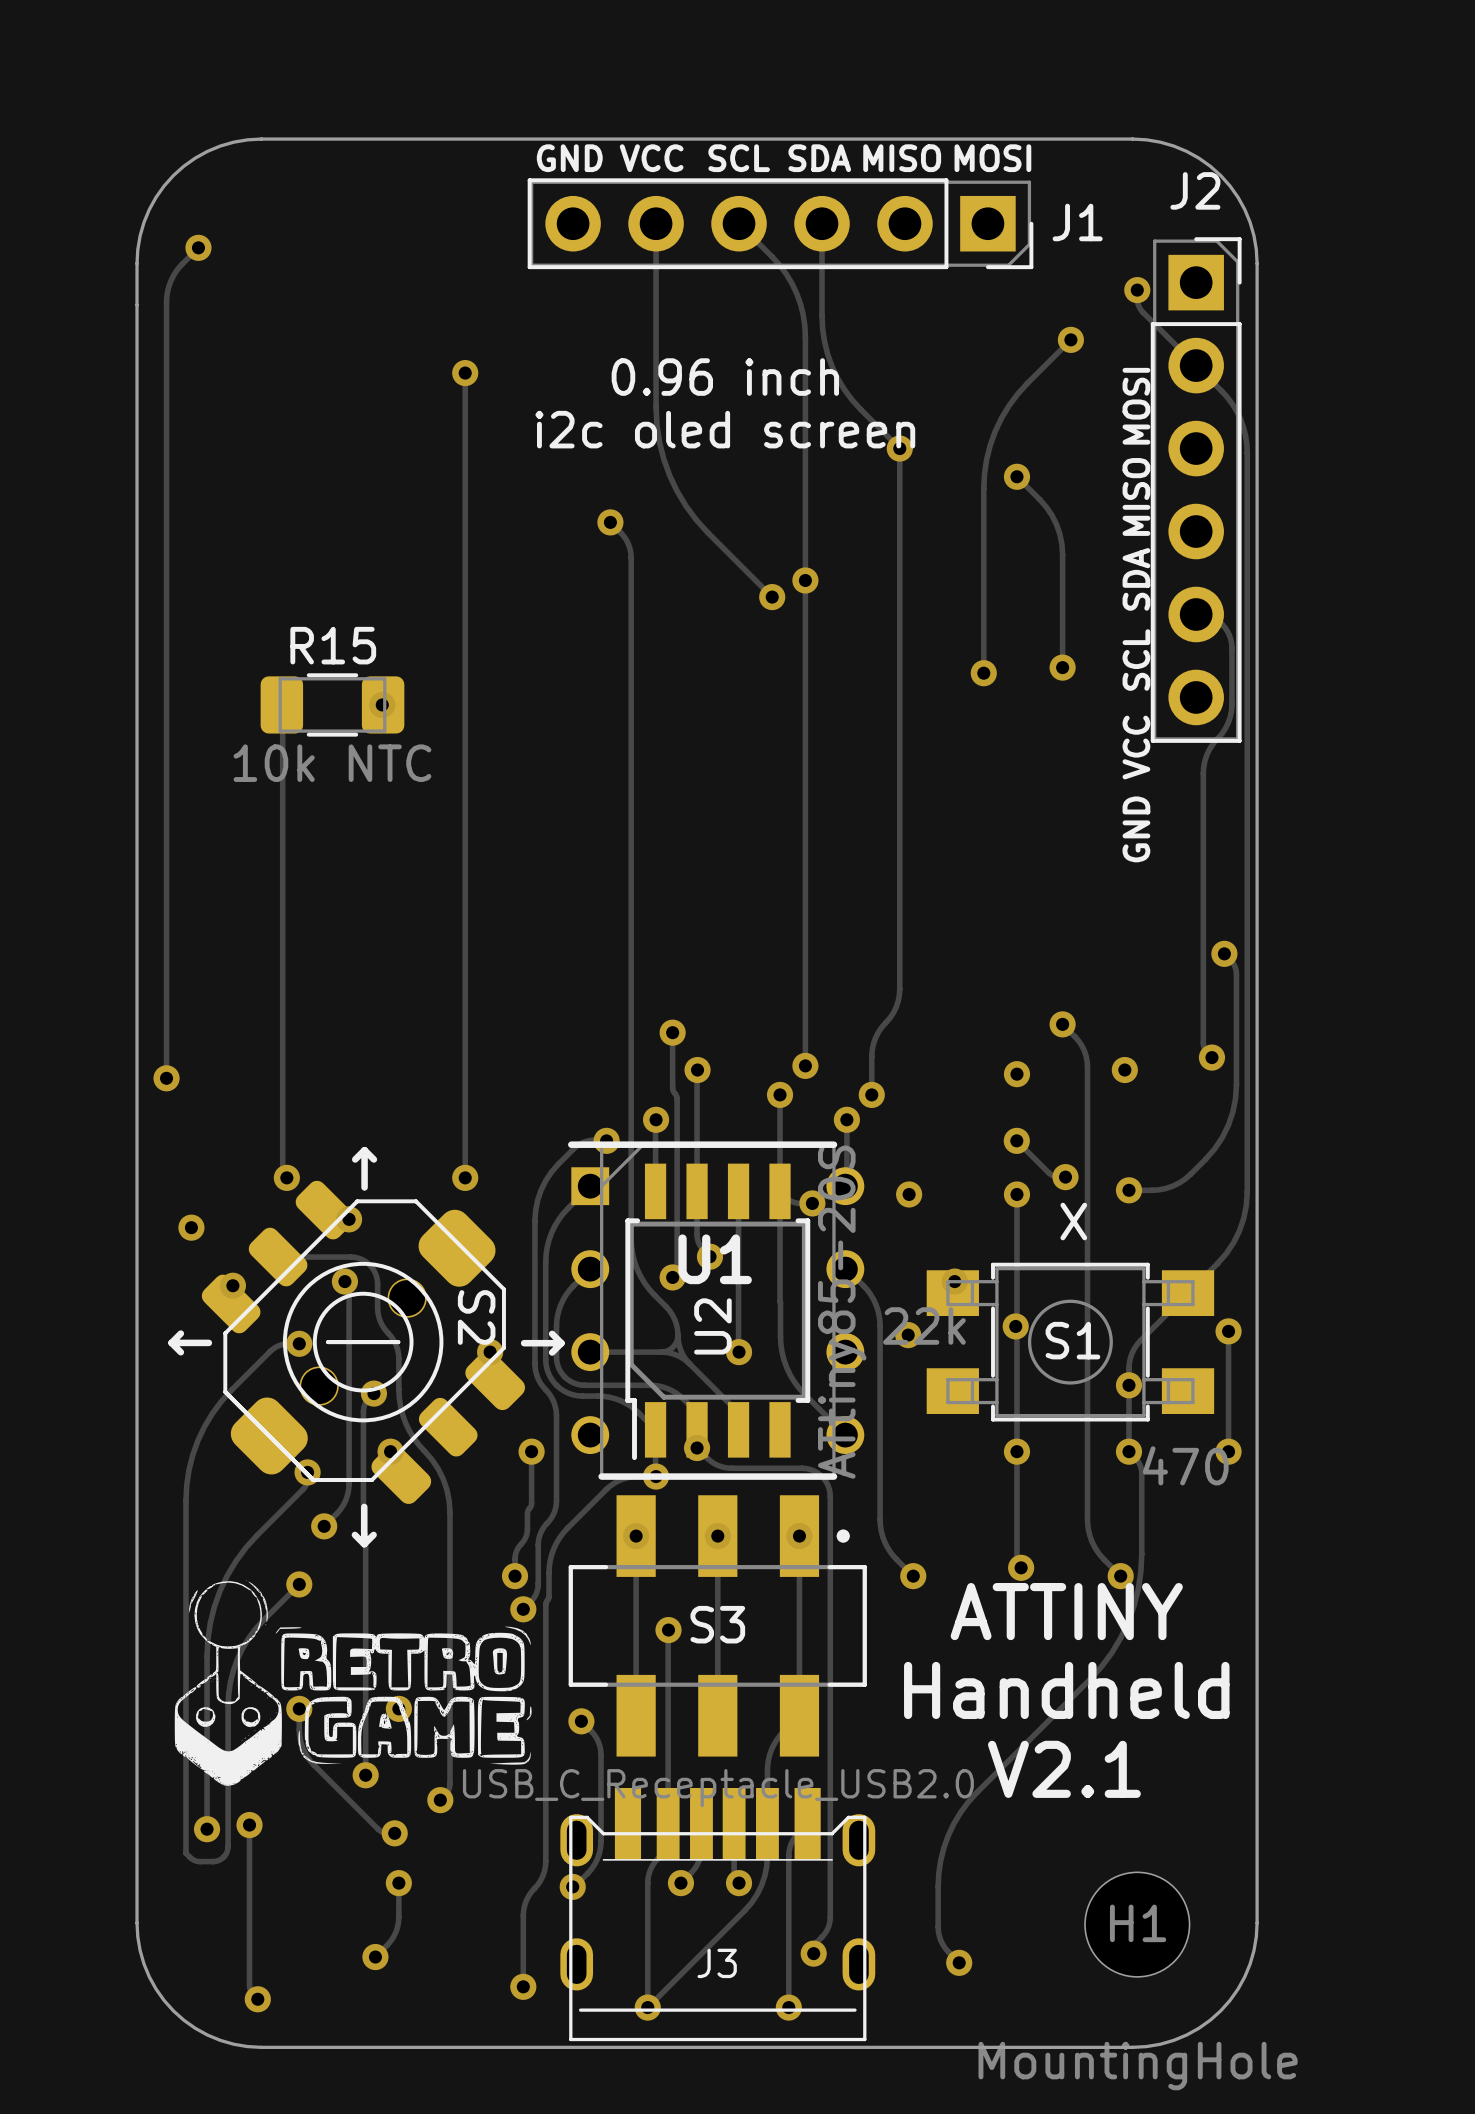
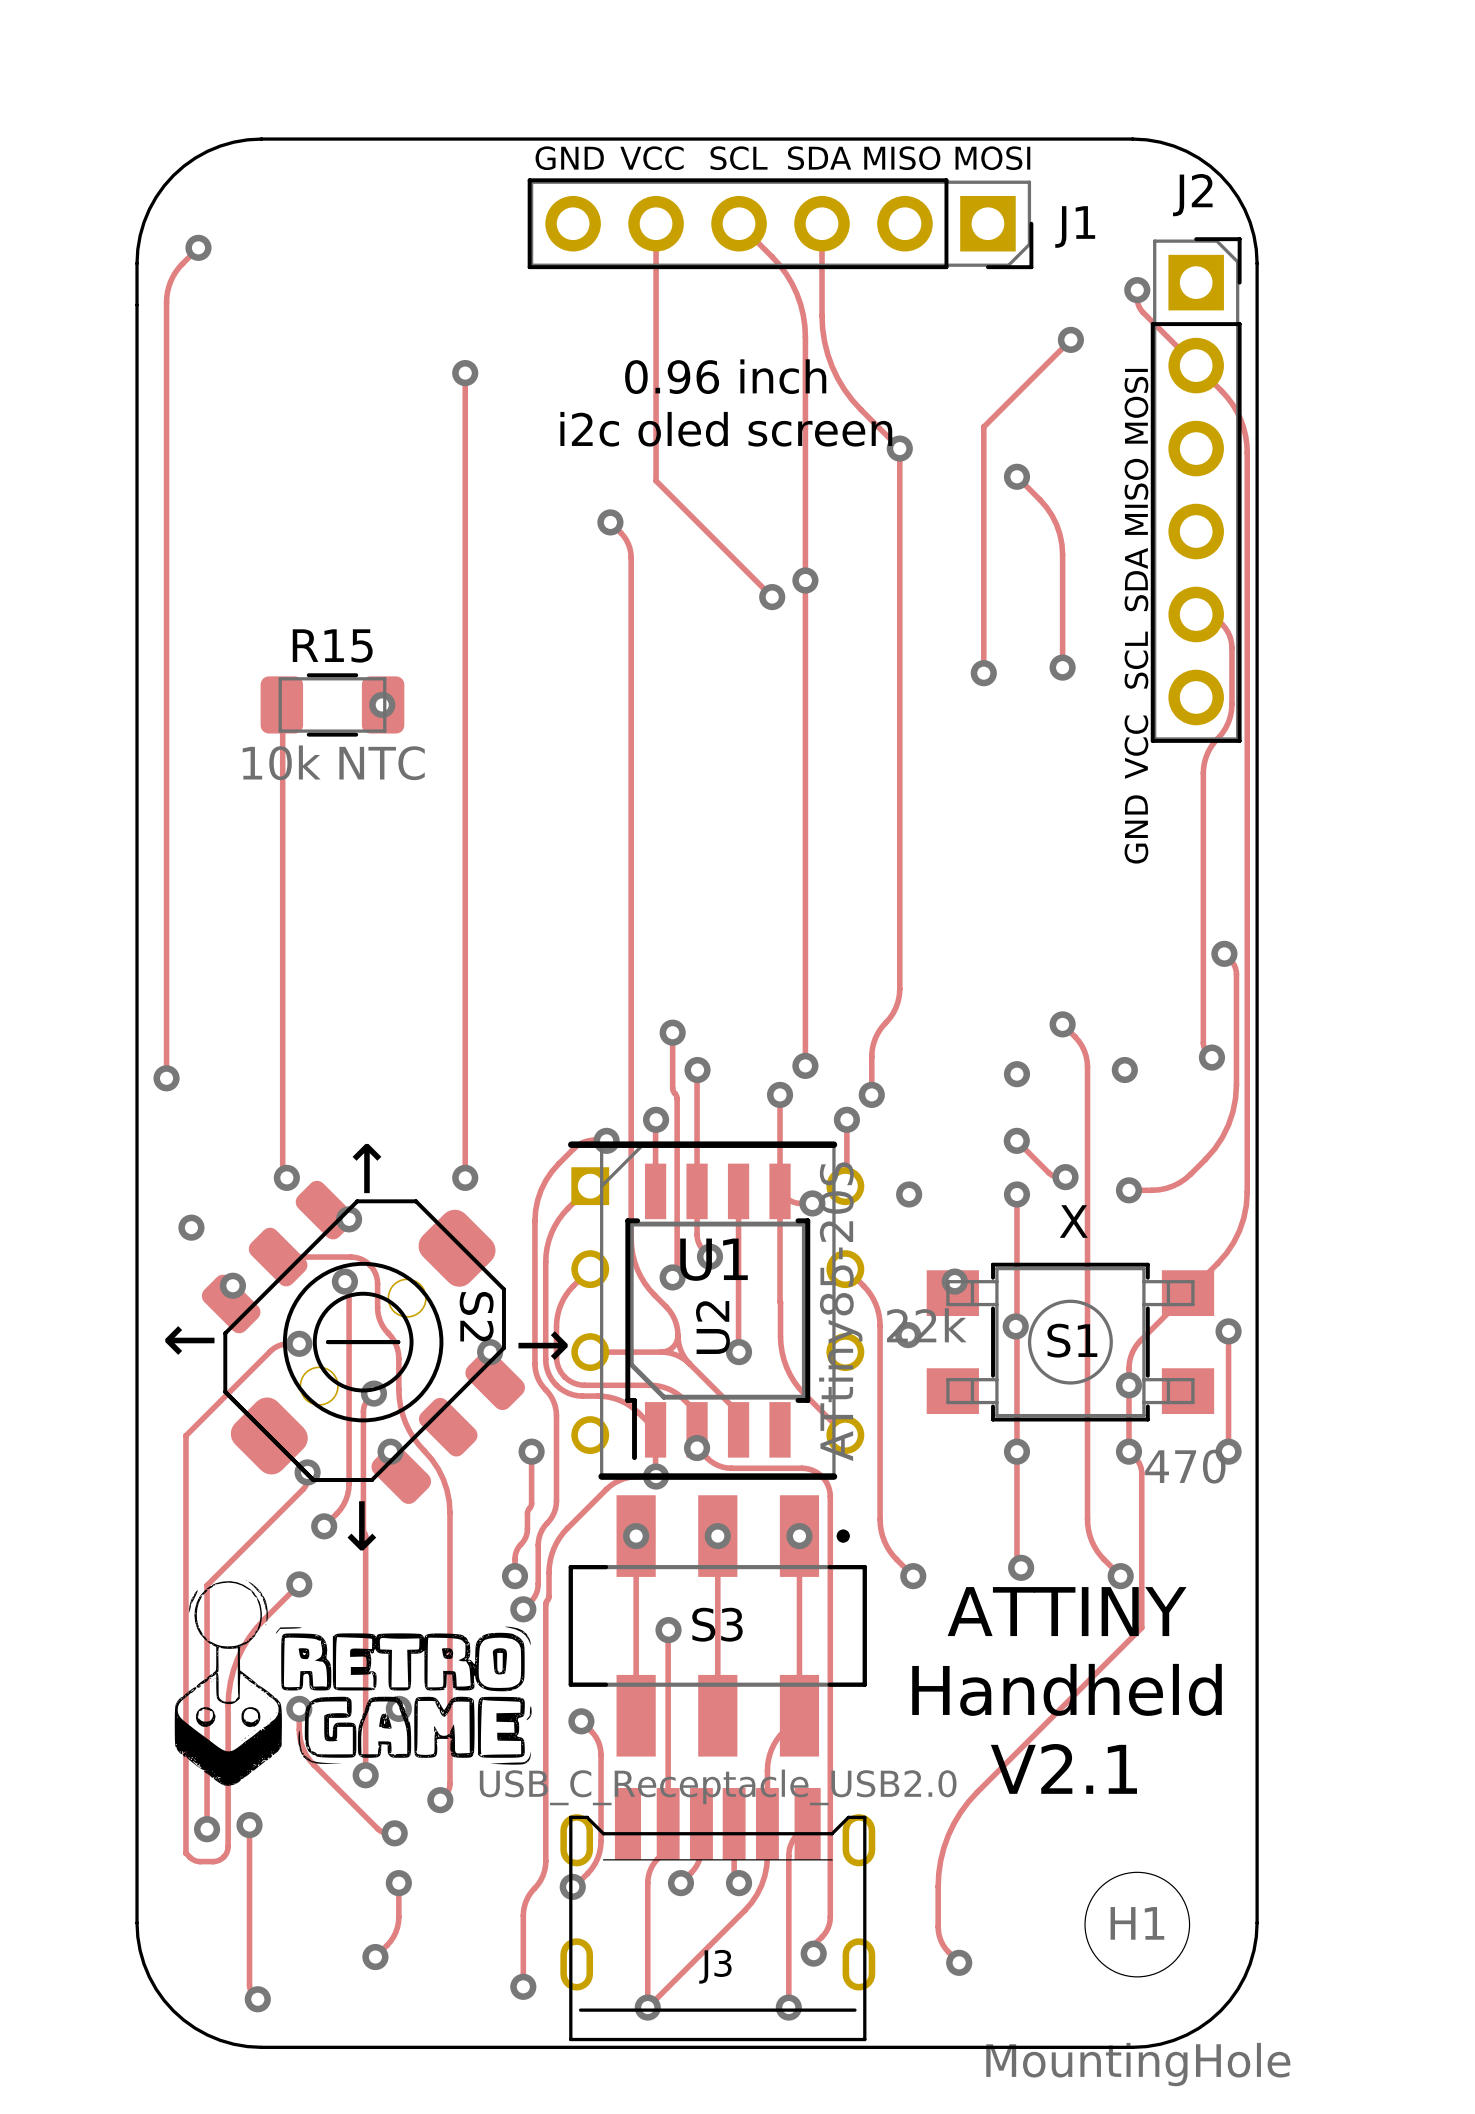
track: (1027, 383) (1008, 405) (995, 431) (986, 459) (983, 488) -> (1027, 383) (983, 427) (983, 488)
track: (656, 407) (659, 441) (669, 475) (686, 506) (708, 532) -> (656, 407) (656, 480) (708, 532)
track: (231, 1389) (212, 1413) (197, 1440) (188, 1470) (185, 1500) -> (231, 1389) (185, 1435) (185, 1500)
track: (257, 1535) (235, 1561) (220, 1590) (210, 1623) (207, 1656) -> (257, 1535) (207, 1585) (207, 1656)
track: (1141, 1554) (1138, 1588) (1128, 1622) (1111, 1652) (1089, 1679) -> (1141, 1554) (1141, 1627) (1089, 1679)

